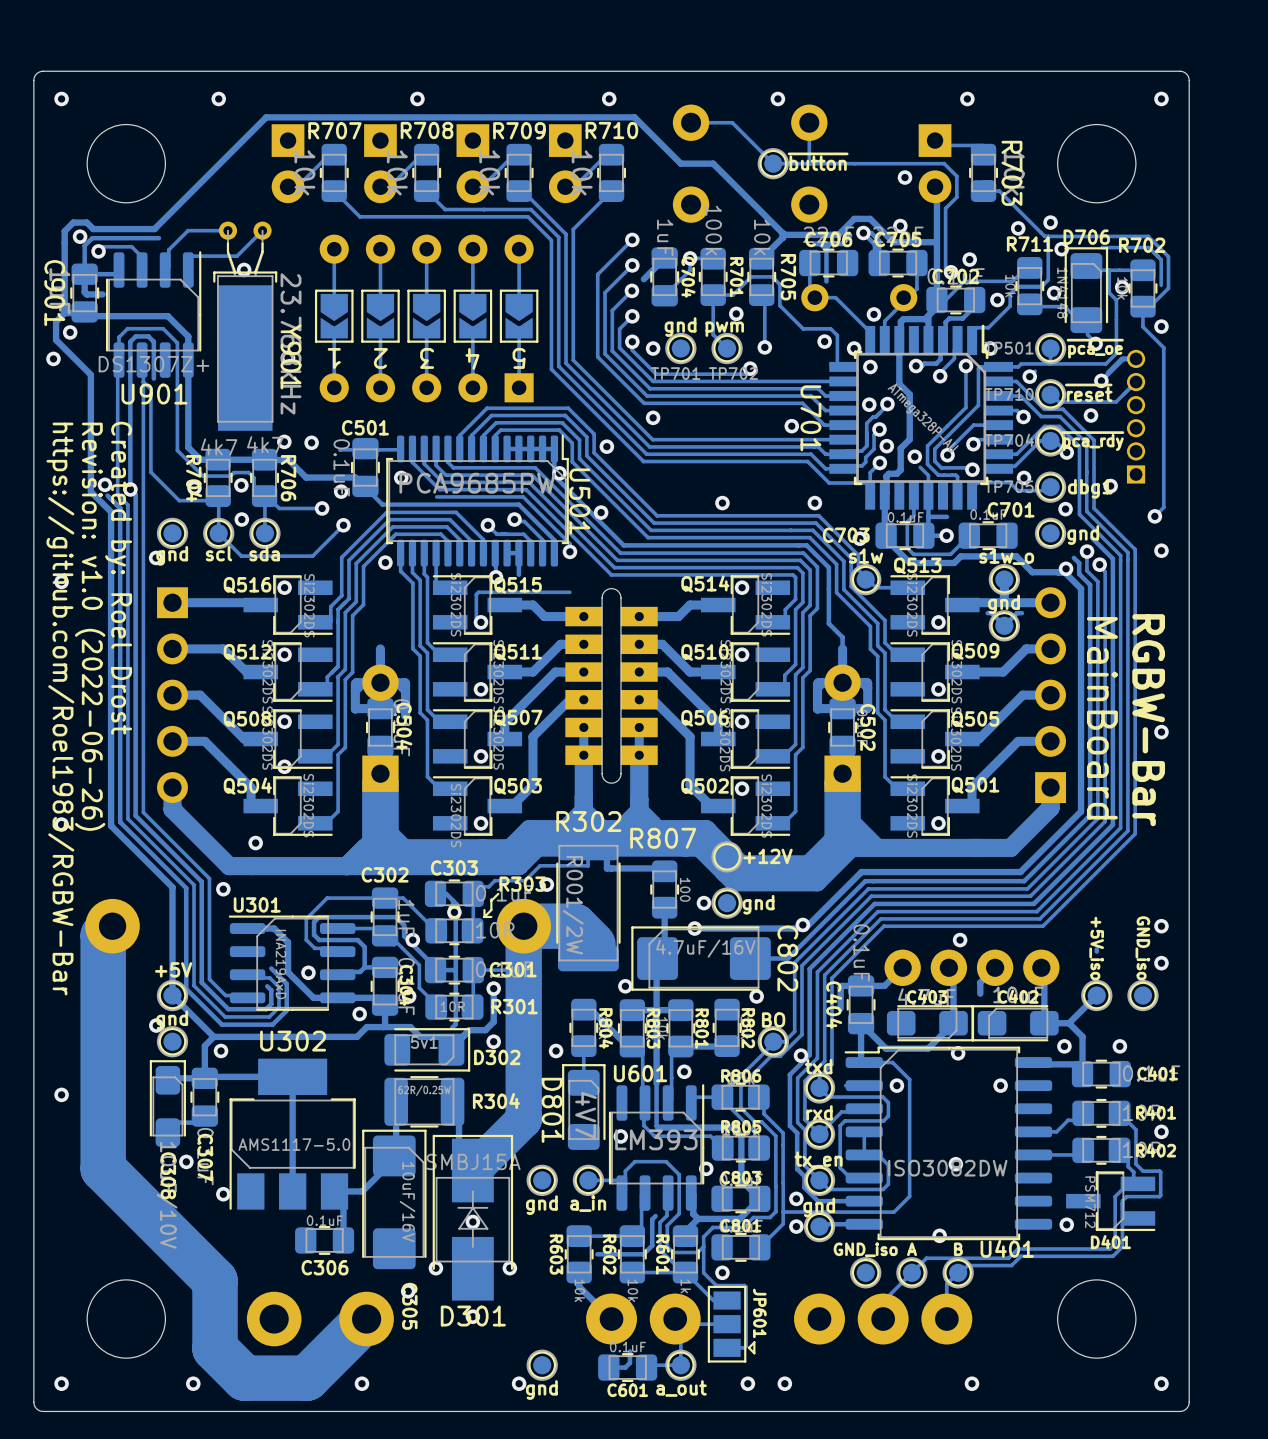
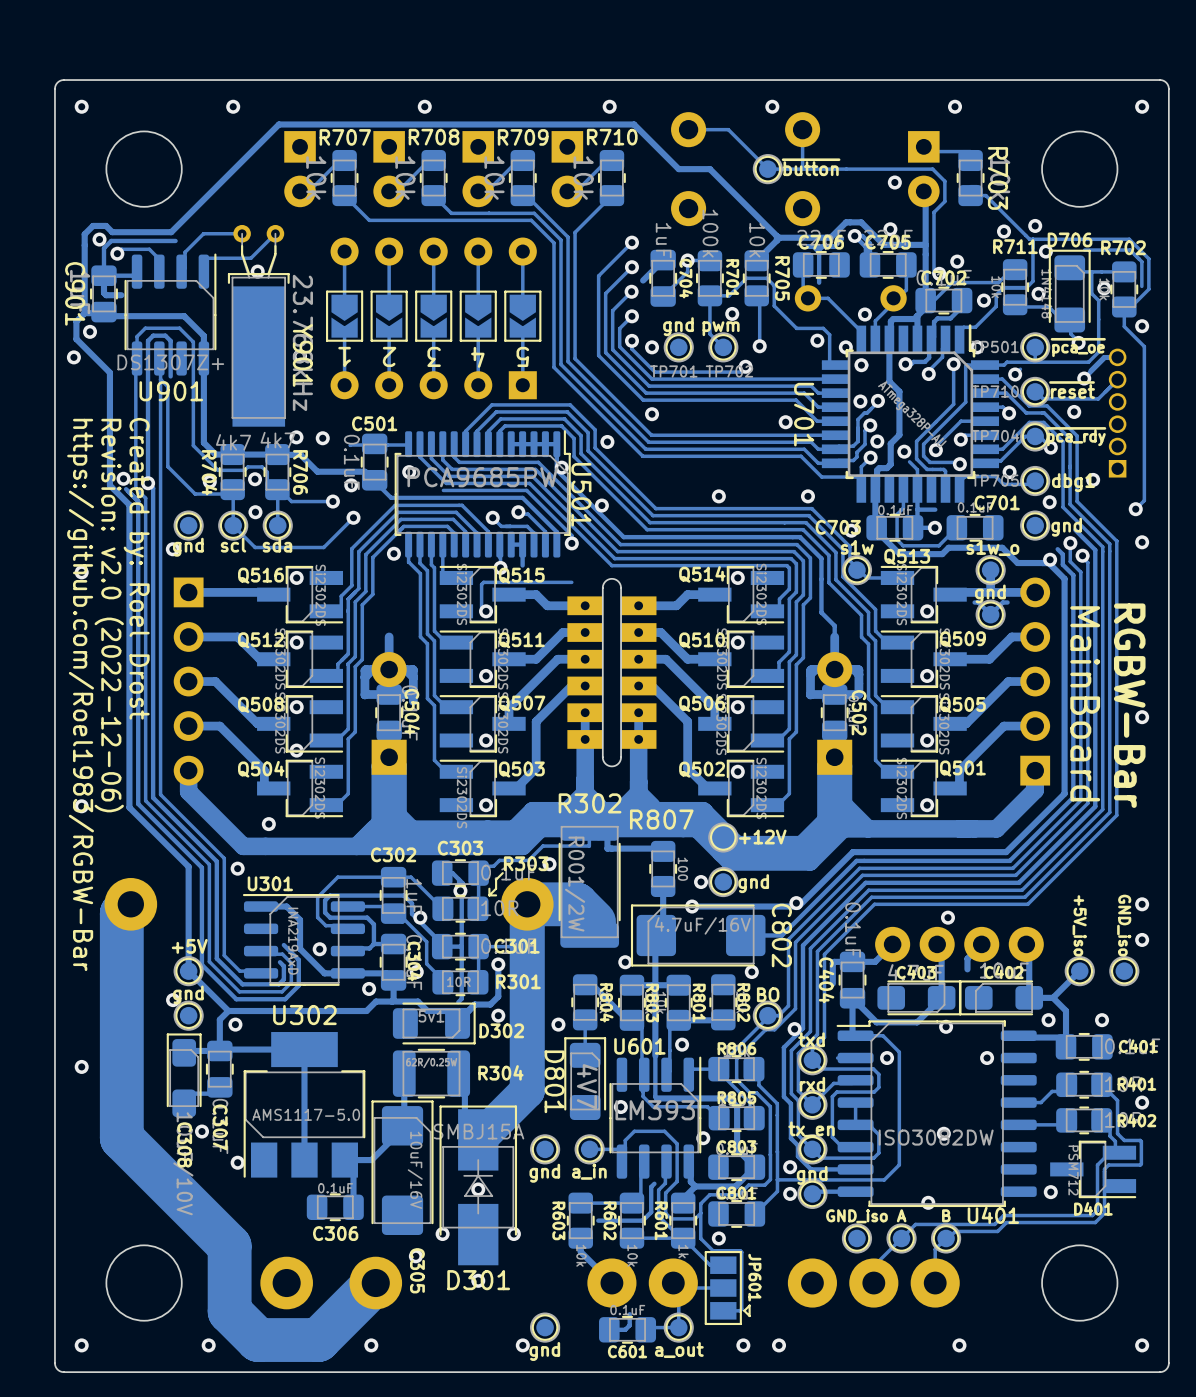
text: Revision: v1.0 (2022-06-26) (90, 626) -> Revision: v2.0 (2022-12-06) (109, 615)
track: (1096, 949) (1096, 951) -> none

